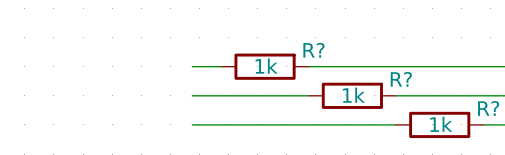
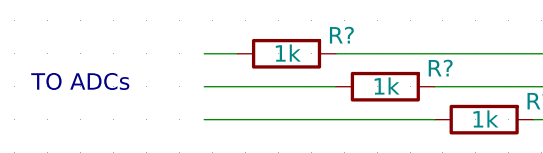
text: none -> TO ADCs (80, 81)

